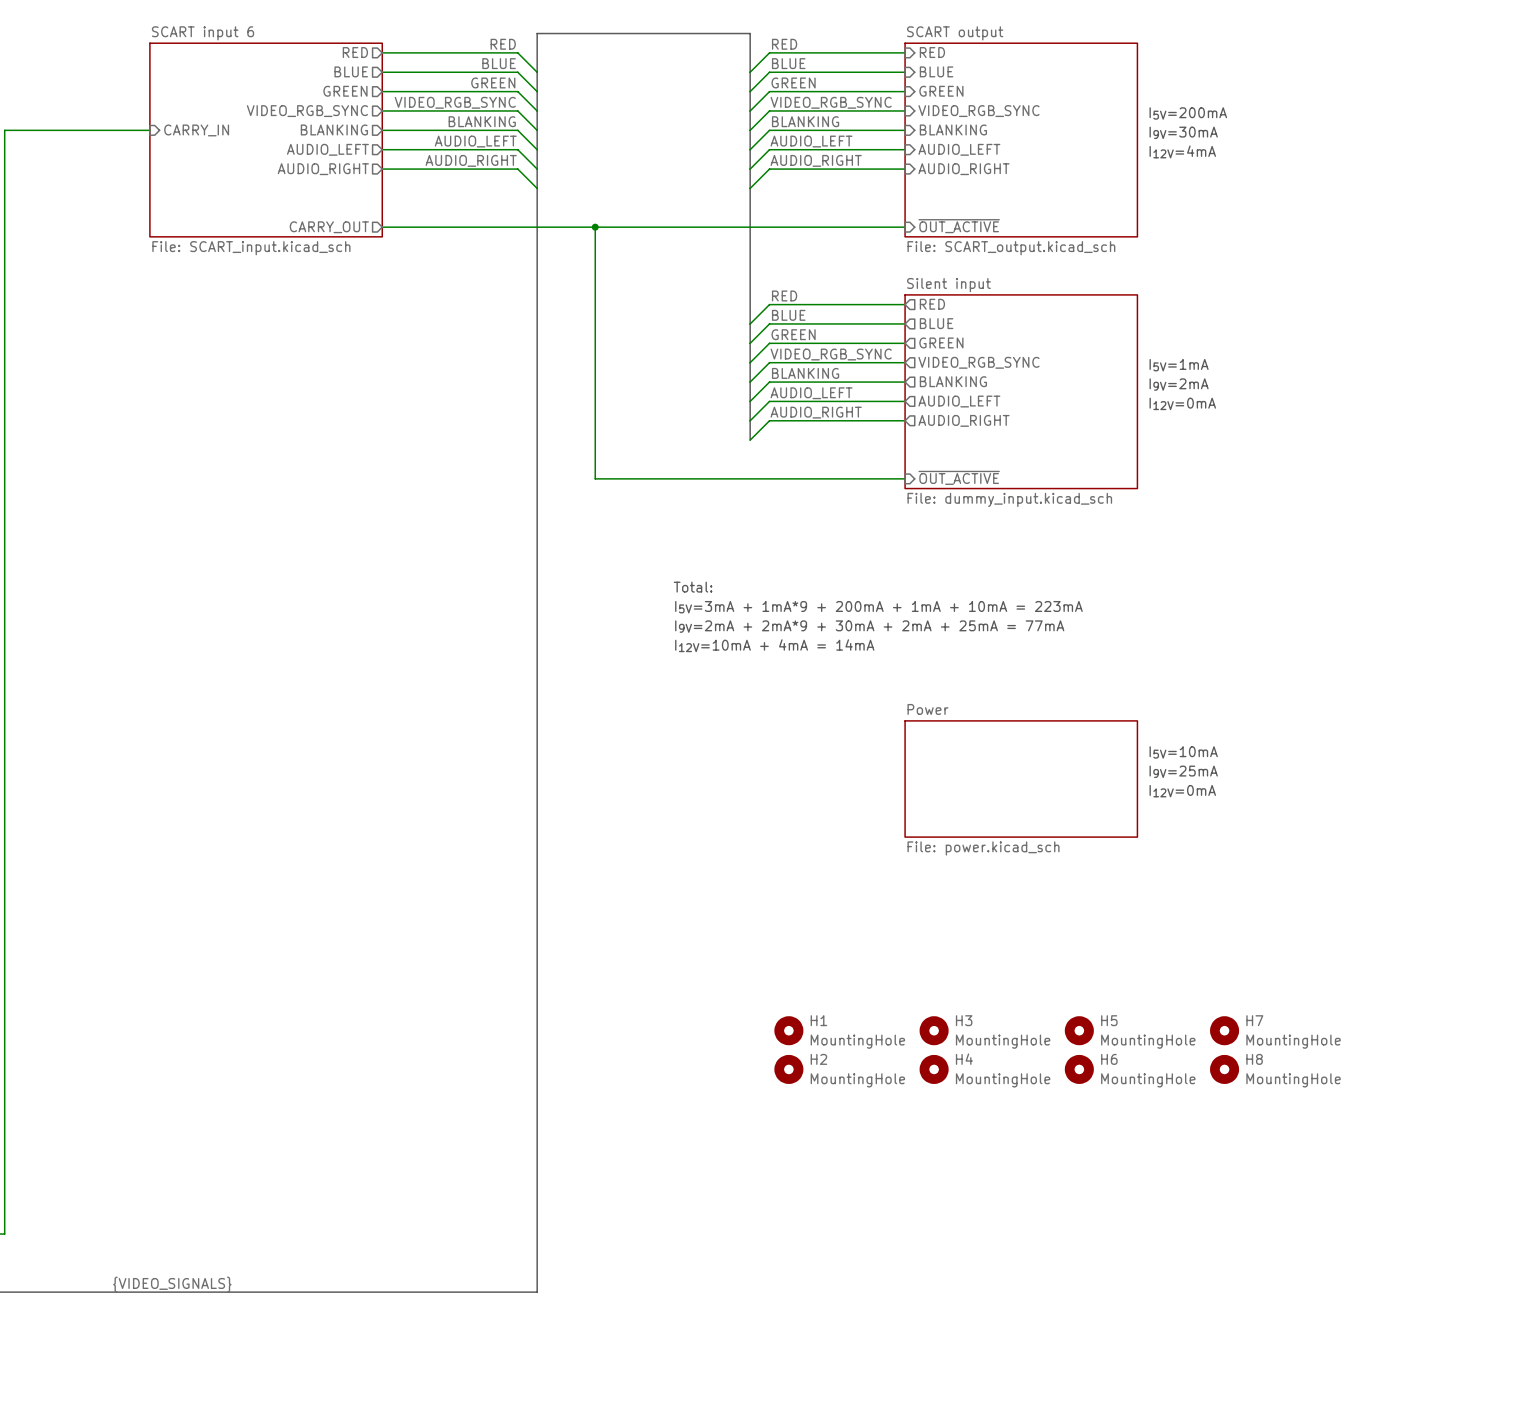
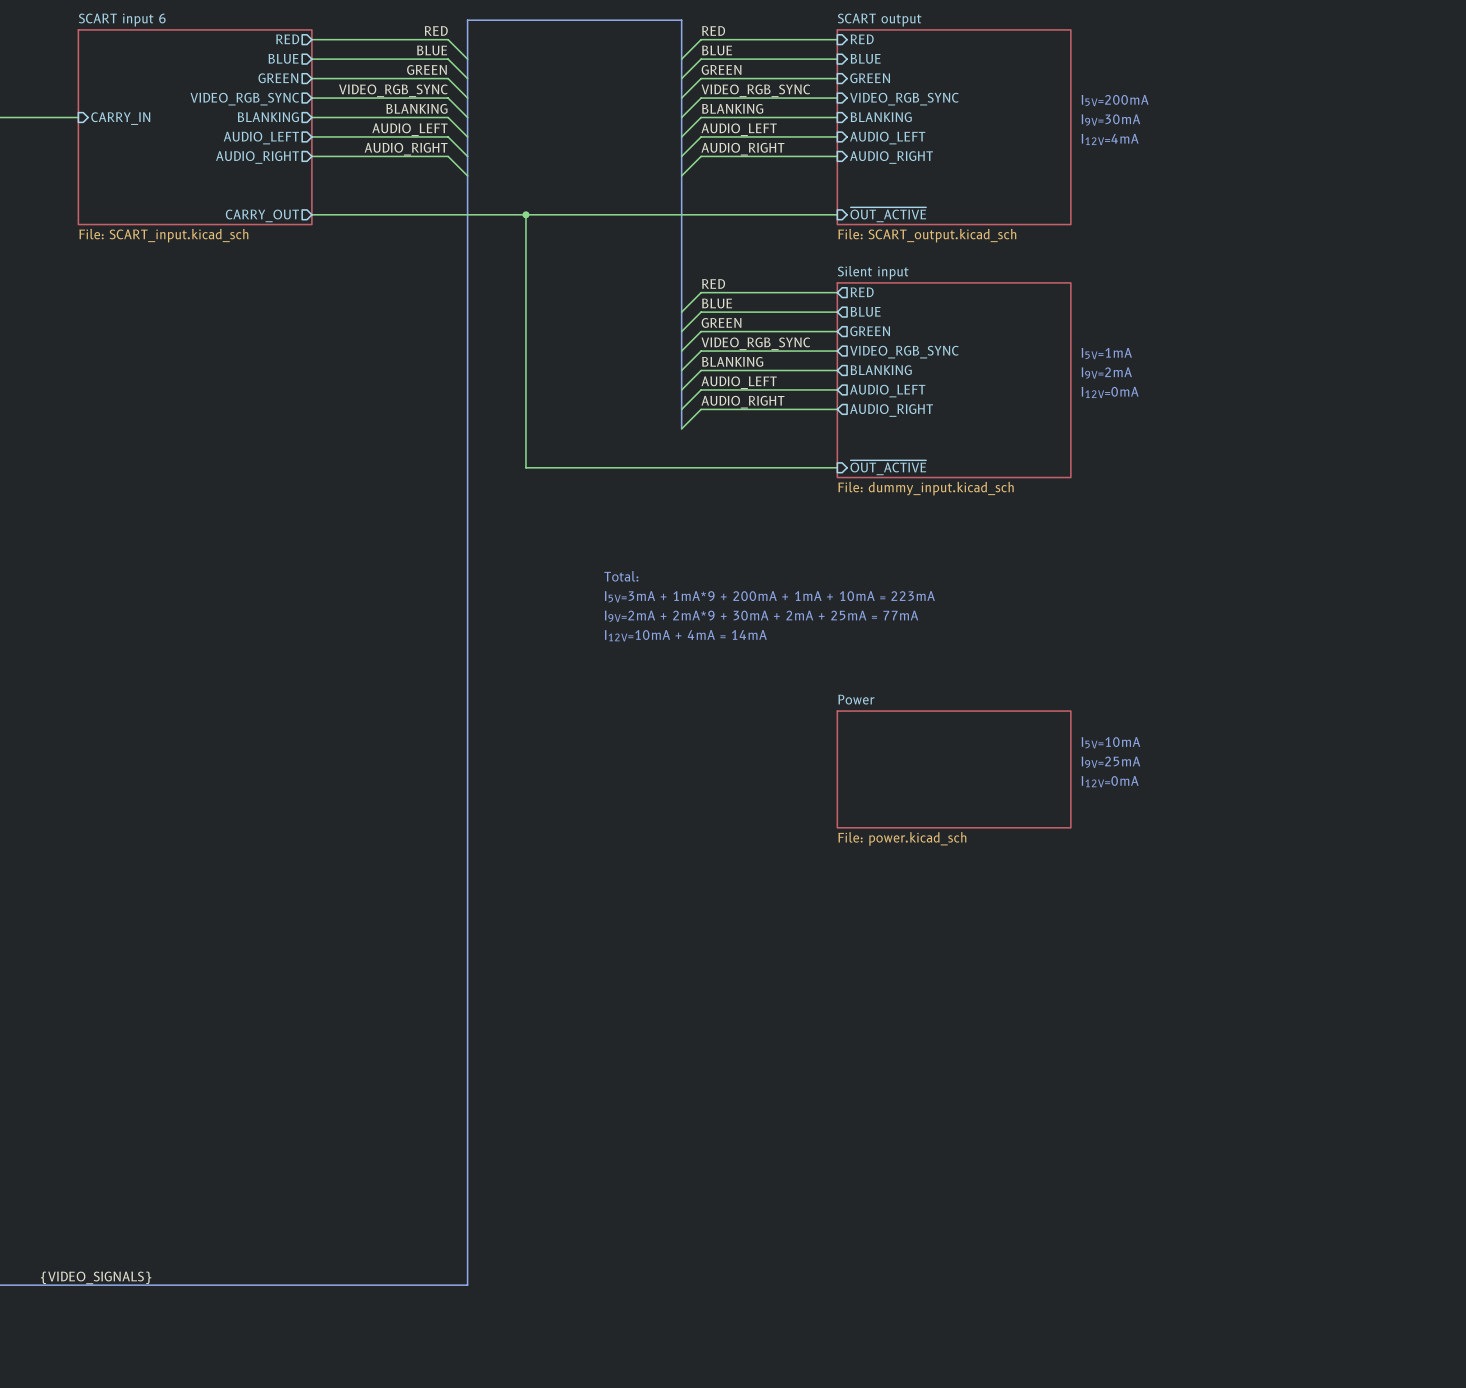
H1: MountingHole (788, 1030) -> none
H3: MountingHole (934, 1030) -> none
H5: MountingHole (1079, 1030) -> none
H7: MountingHole (1224, 1030) -> none
H2: MountingHole (788, 1069) -> none
H4: MountingHole (934, 1069) -> none
H6: MountingHole (1079, 1069) -> none
H8: MountingHole (1224, 1069) -> none

